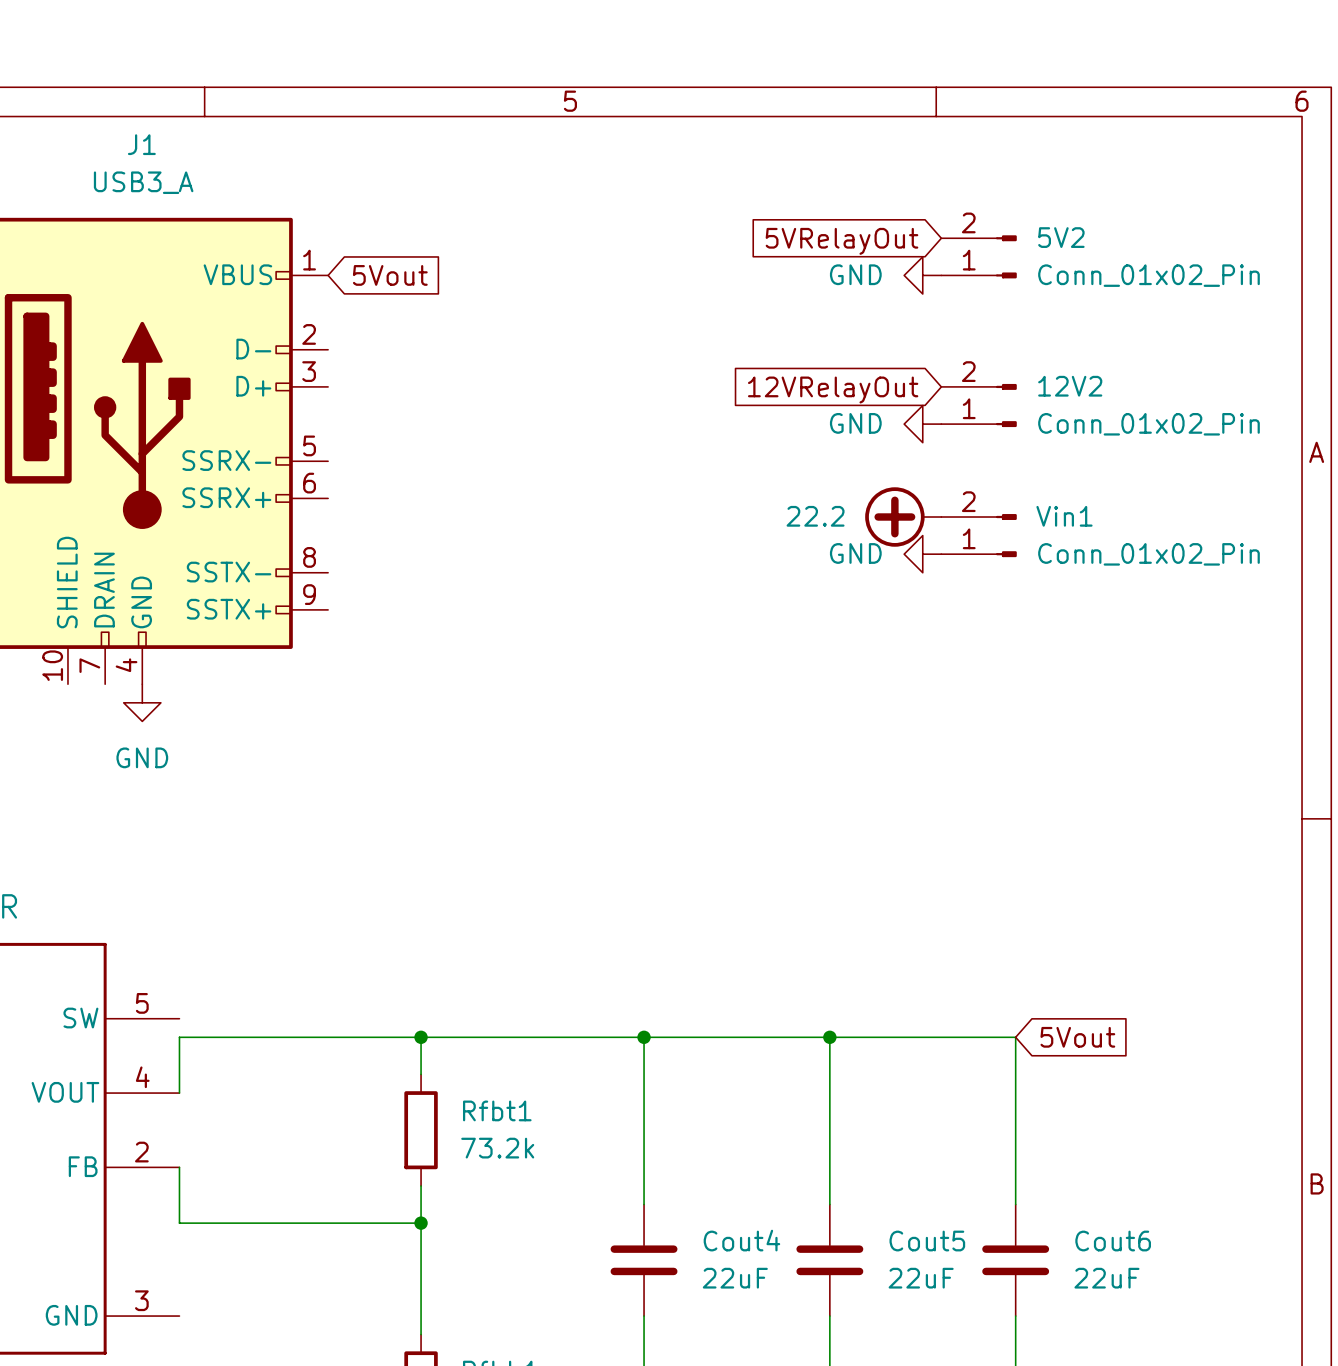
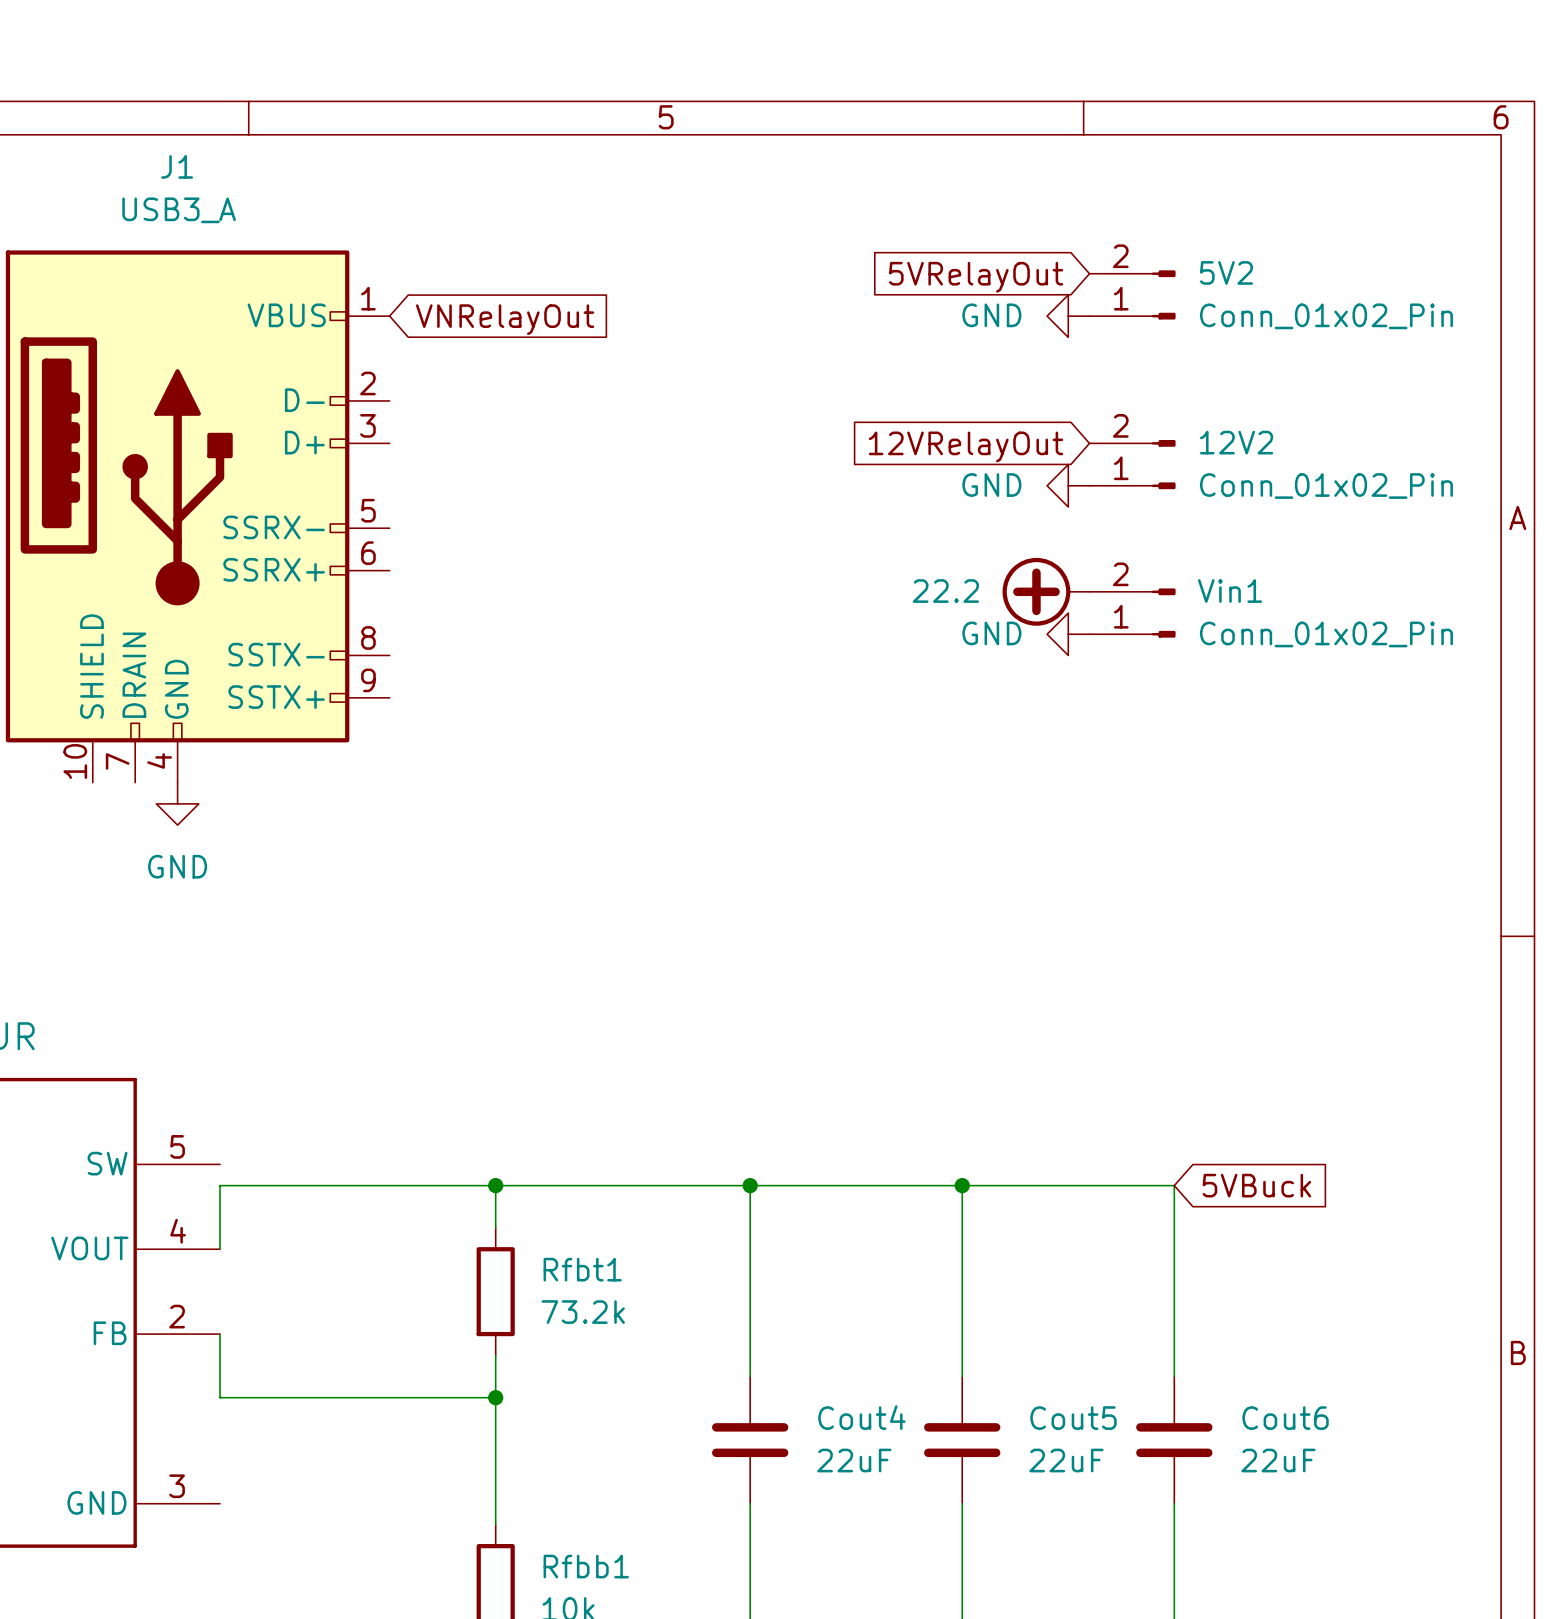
global label: 5Vout (390, 275) -> VNRelayOut (505, 319)
global label: 5Vout (1077, 1037) -> 5VBuck (1256, 1185)

